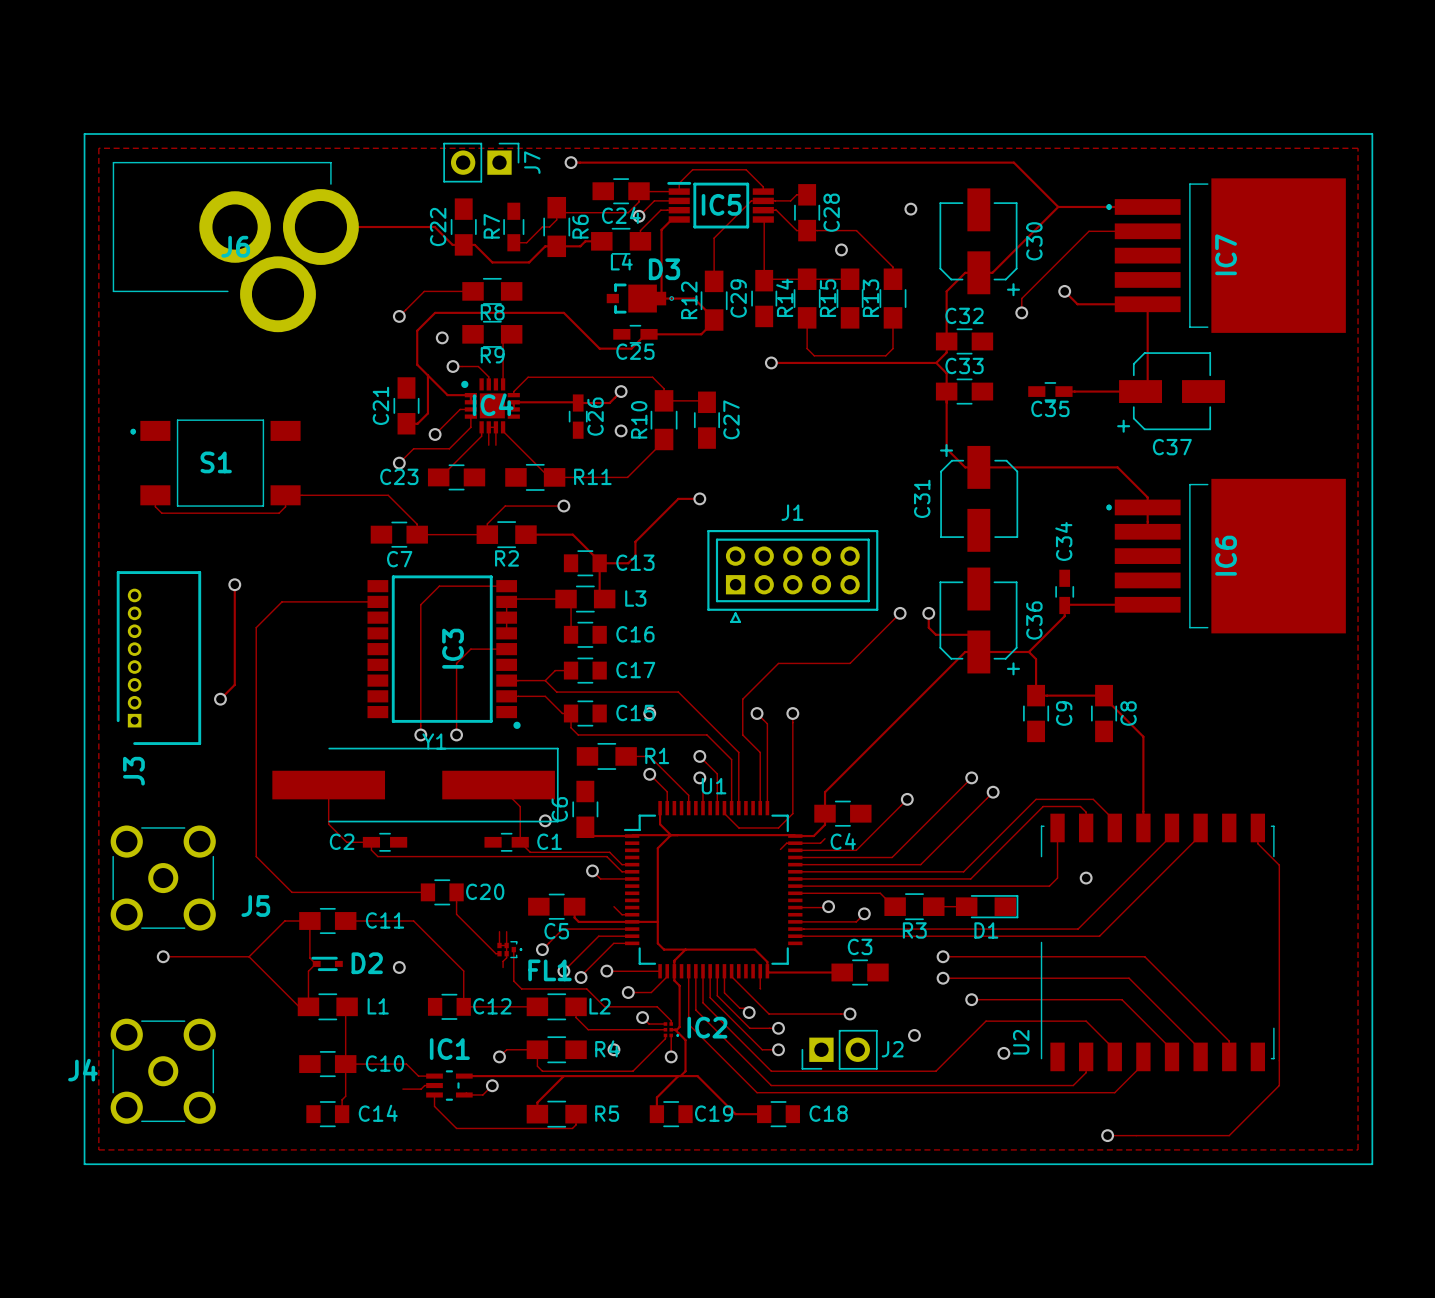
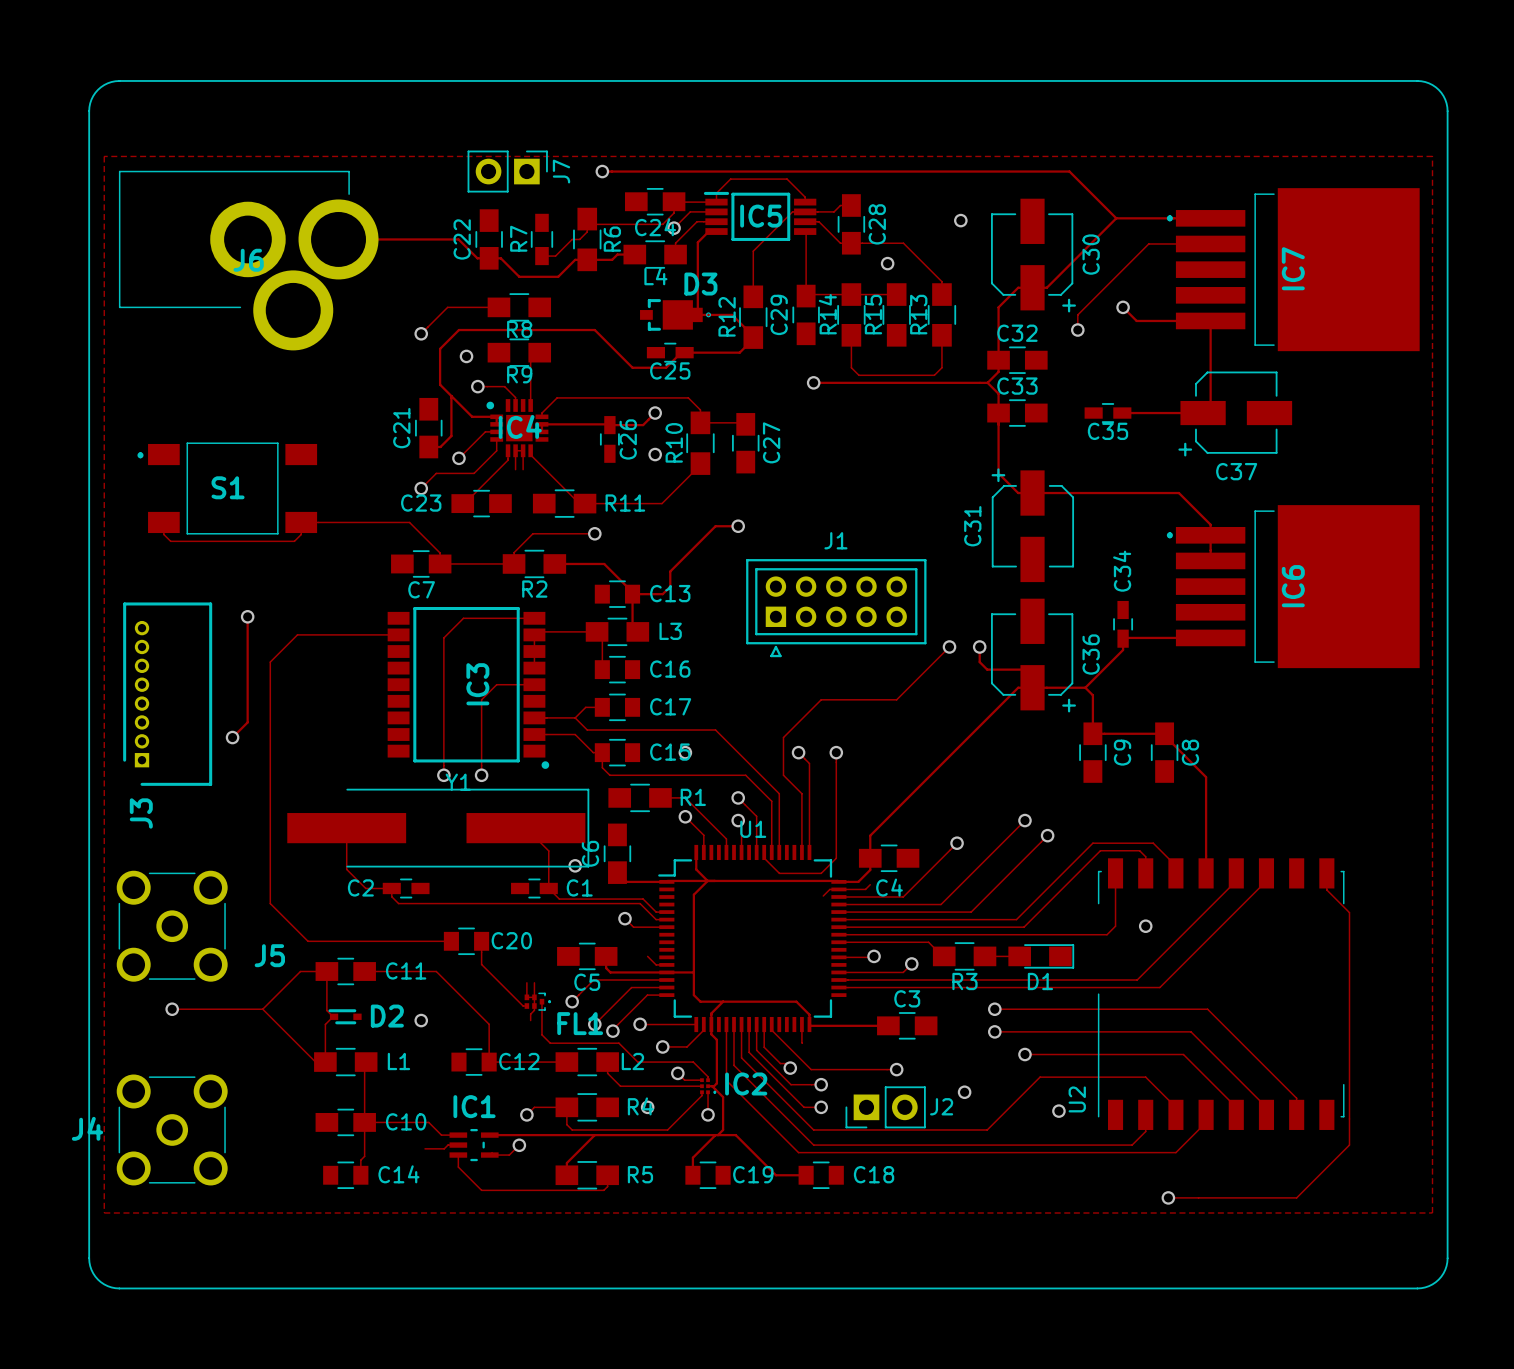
line: (84, 134) (1372, 134) -> (89, 141) (89, 107) (93, 96) (104, 85) (119, 80) (1417, 80) (1432, 85) (1443, 96) (1447, 107) (1447, 141)
line: (84, 1164) (1372, 1164) -> (89, 1228) (89, 1262) (93, 1273) (104, 1284) (119, 1288) (1417, 1288) (1432, 1284) (1443, 1273) (1447, 1262) (1447, 1228)

